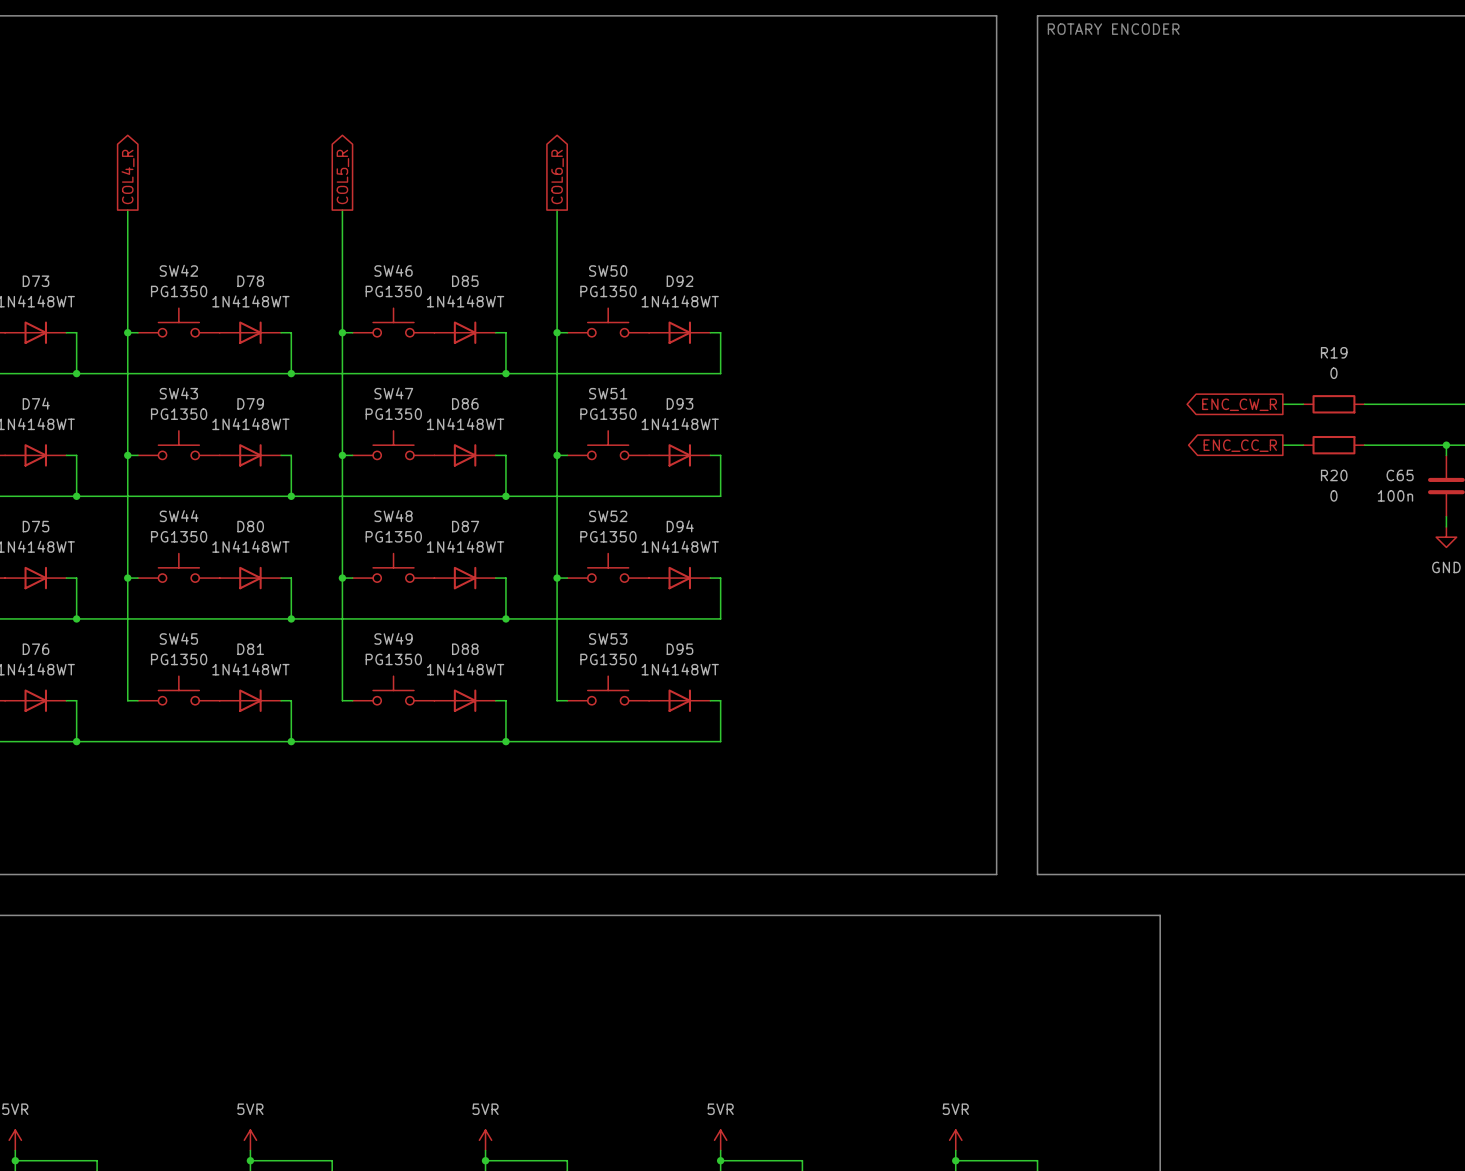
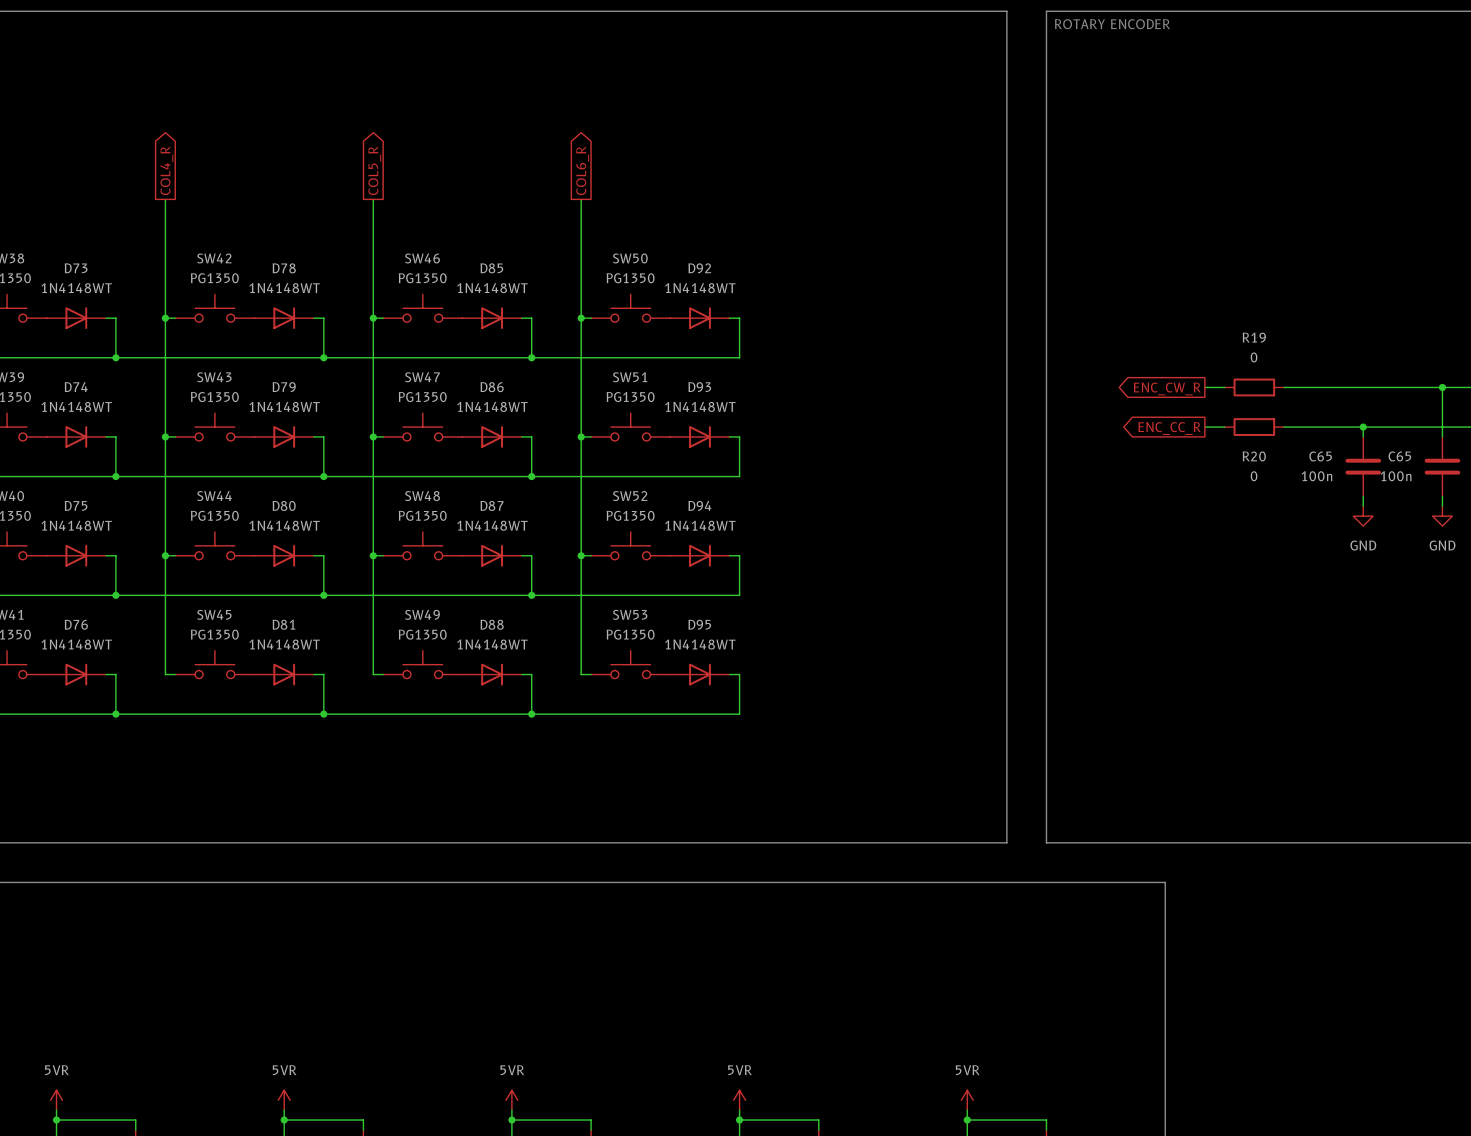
wire: none -> (1204, 387) (1224, 387)
global label position: ENC_CW_R (1239, 404) -> ENC_CW_R (1167, 388)
wire: none -> (1303, 387) (1363, 387)
R19 position: (1333, 404) -> (1254, 387)
wire: none -> (1442, 387) (1442, 427)
junction: none -> (1442, 387)
wire: none -> (1204, 427) (1224, 427)
global label position: ENC_CC_R (1240, 445) -> ENC_CC_R (1169, 428)
wire: none -> (1303, 427) (1363, 427) (1363, 436)
R20 position: (1333, 445) -> (1254, 427)
junction: none -> (1363, 427)
junction: (1446, 445) -> none
C65: none -> 100n (1363, 466)
wire: none -> (1363, 496) (1363, 506)
power symbol: none -> GND (1363, 516)

